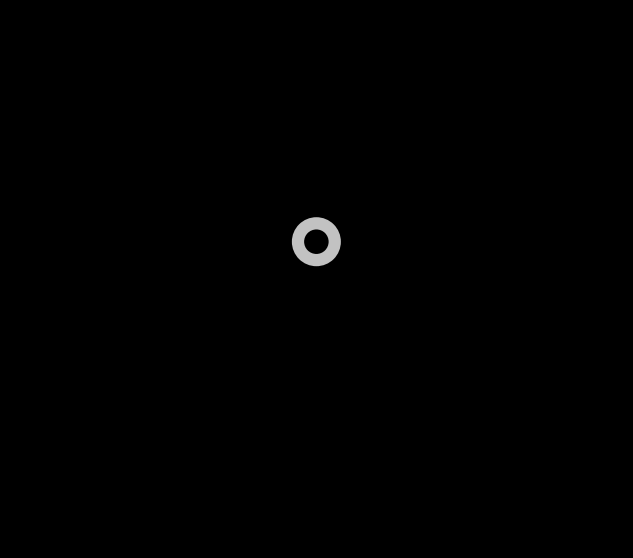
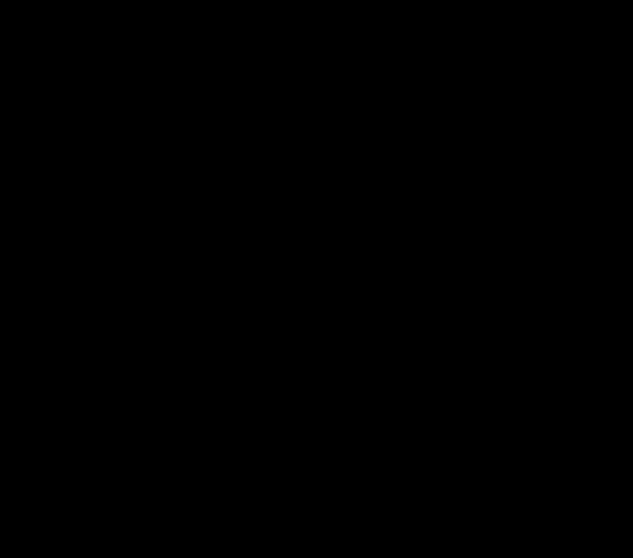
via: (316, 241) -> none

